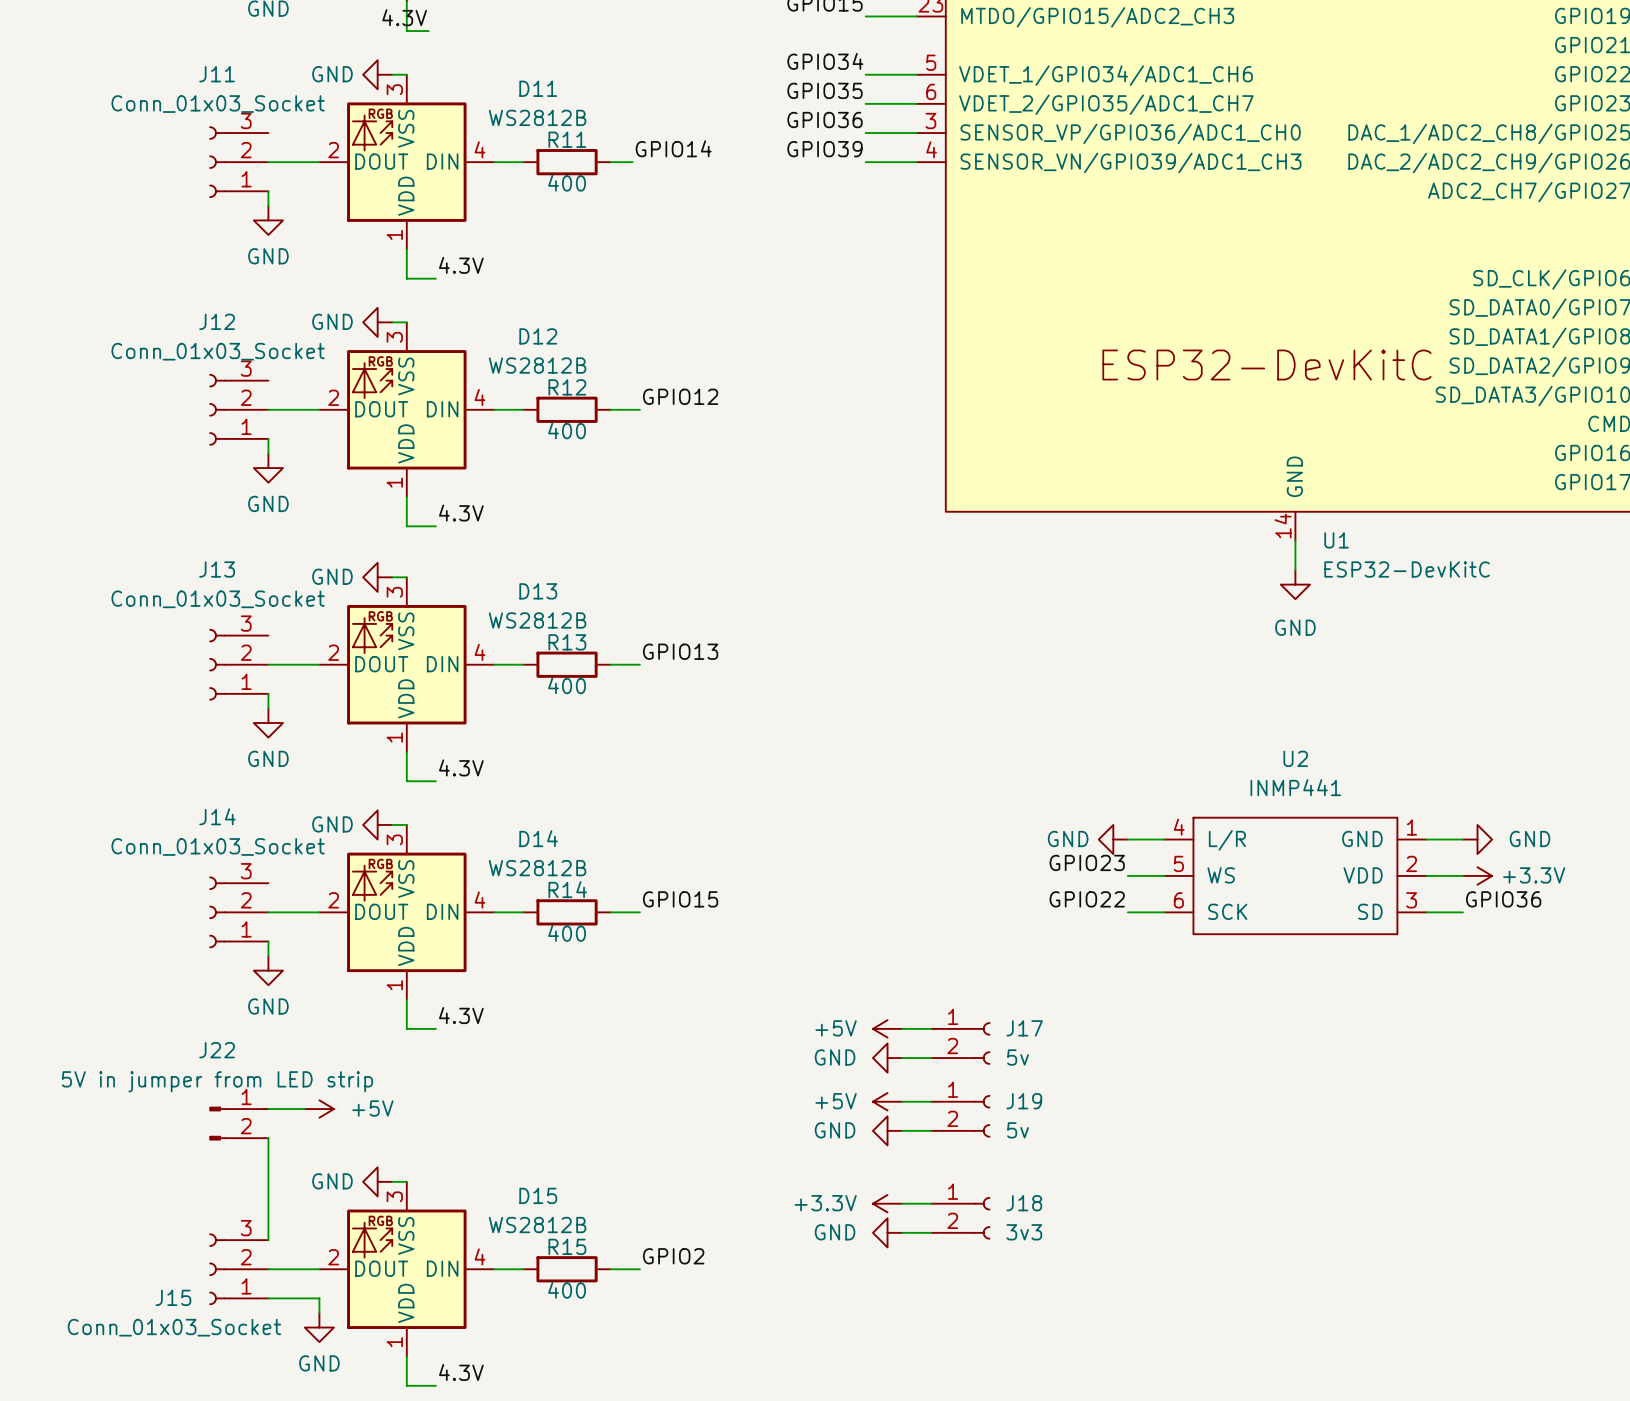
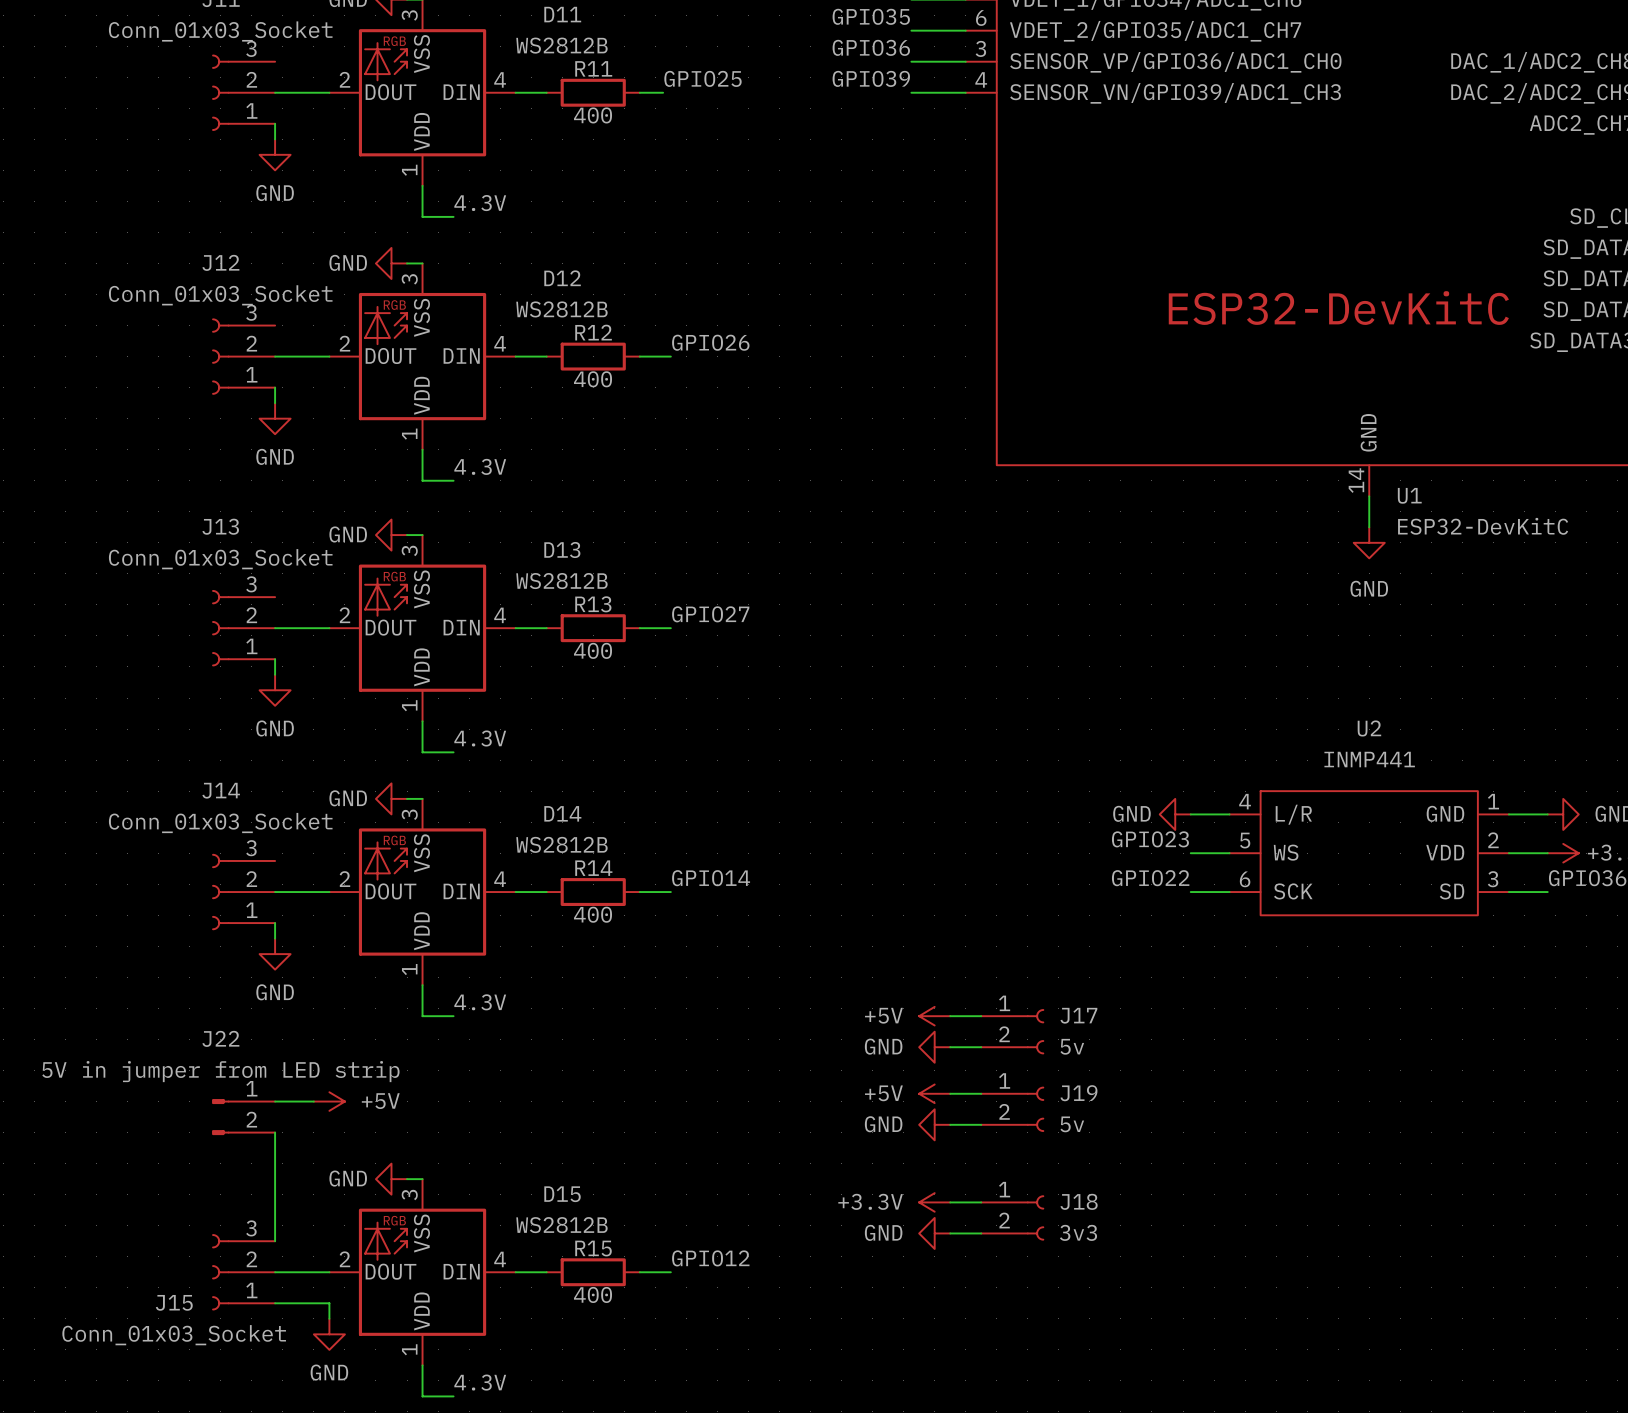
label: GPIO14 (673, 148) -> GPIO25 (702, 78)
label: GPIO12 (680, 396) -> GPIO26 (710, 342)
label: GPIO13 (680, 651) -> GPIO27 (710, 614)
label: GPIO15 (680, 899) -> GPIO14 (711, 878)
label: GPIO2 (673, 1256) -> GPIO12 (710, 1258)

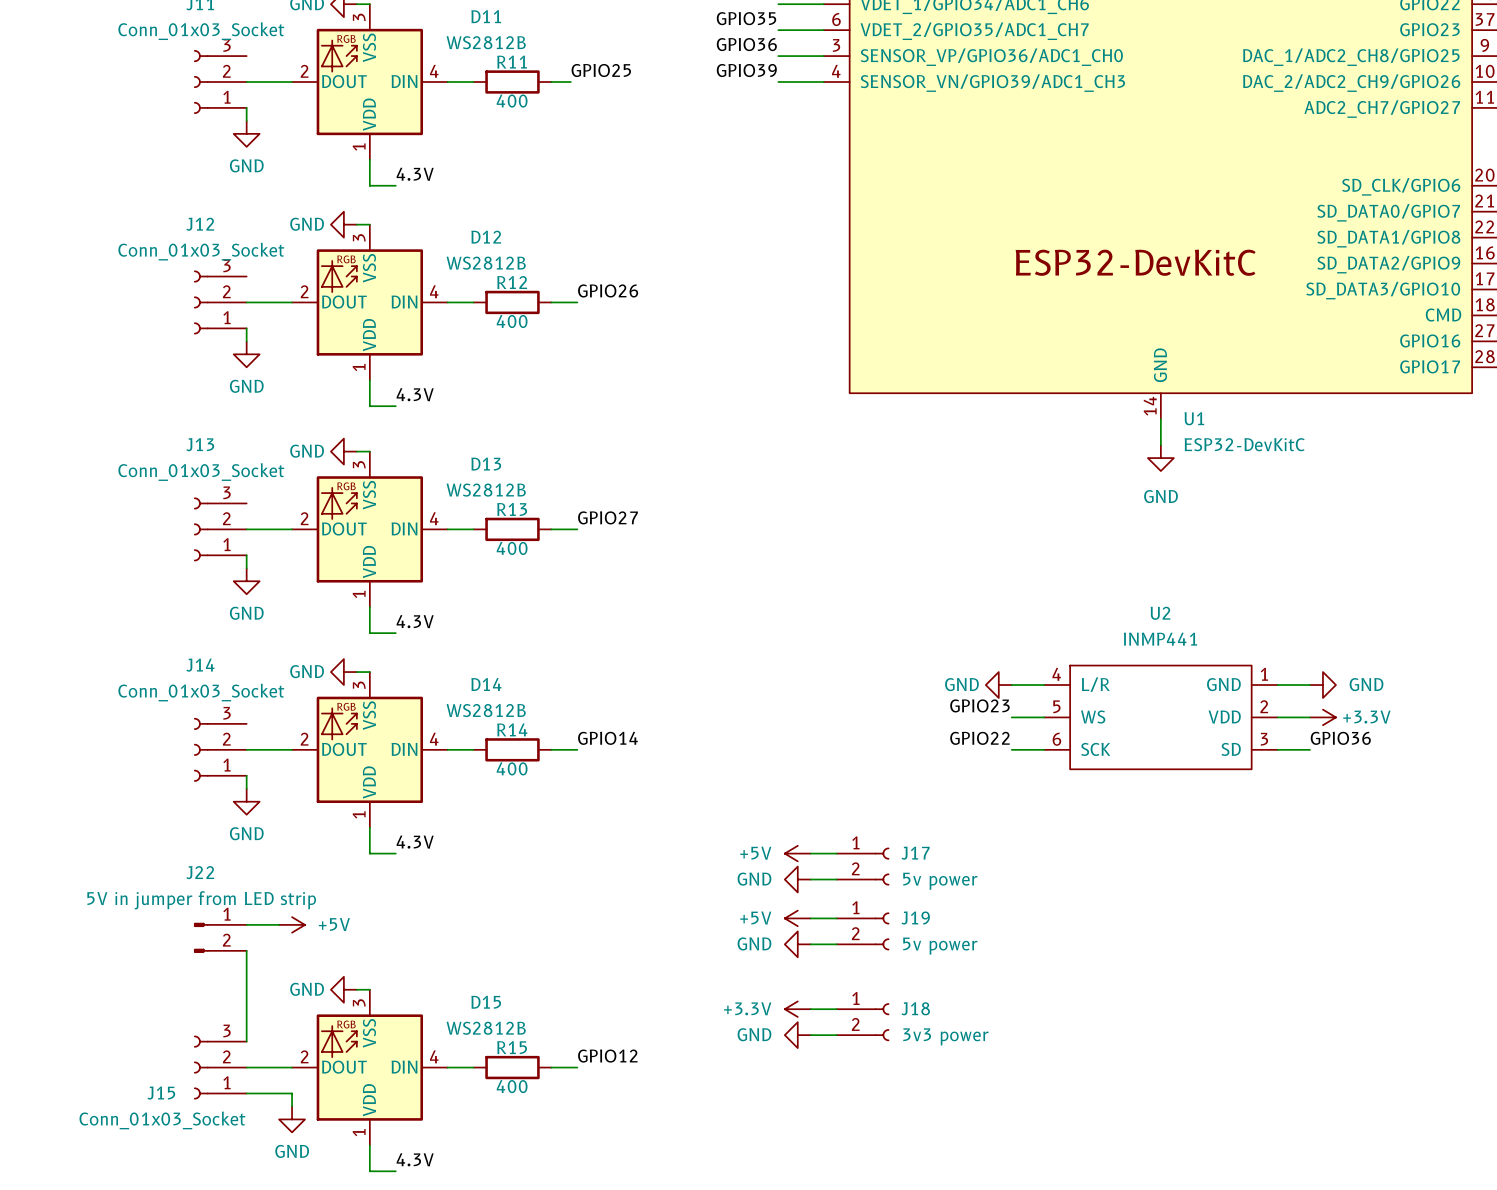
J17 value: 5v (1072, 1046) -> 5v power (940, 881)
J19 value: 5v (1072, 1124) -> 5v power (940, 946)
J18 value: 3v3 (1078, 1232) -> 3v3 power (945, 1036)

